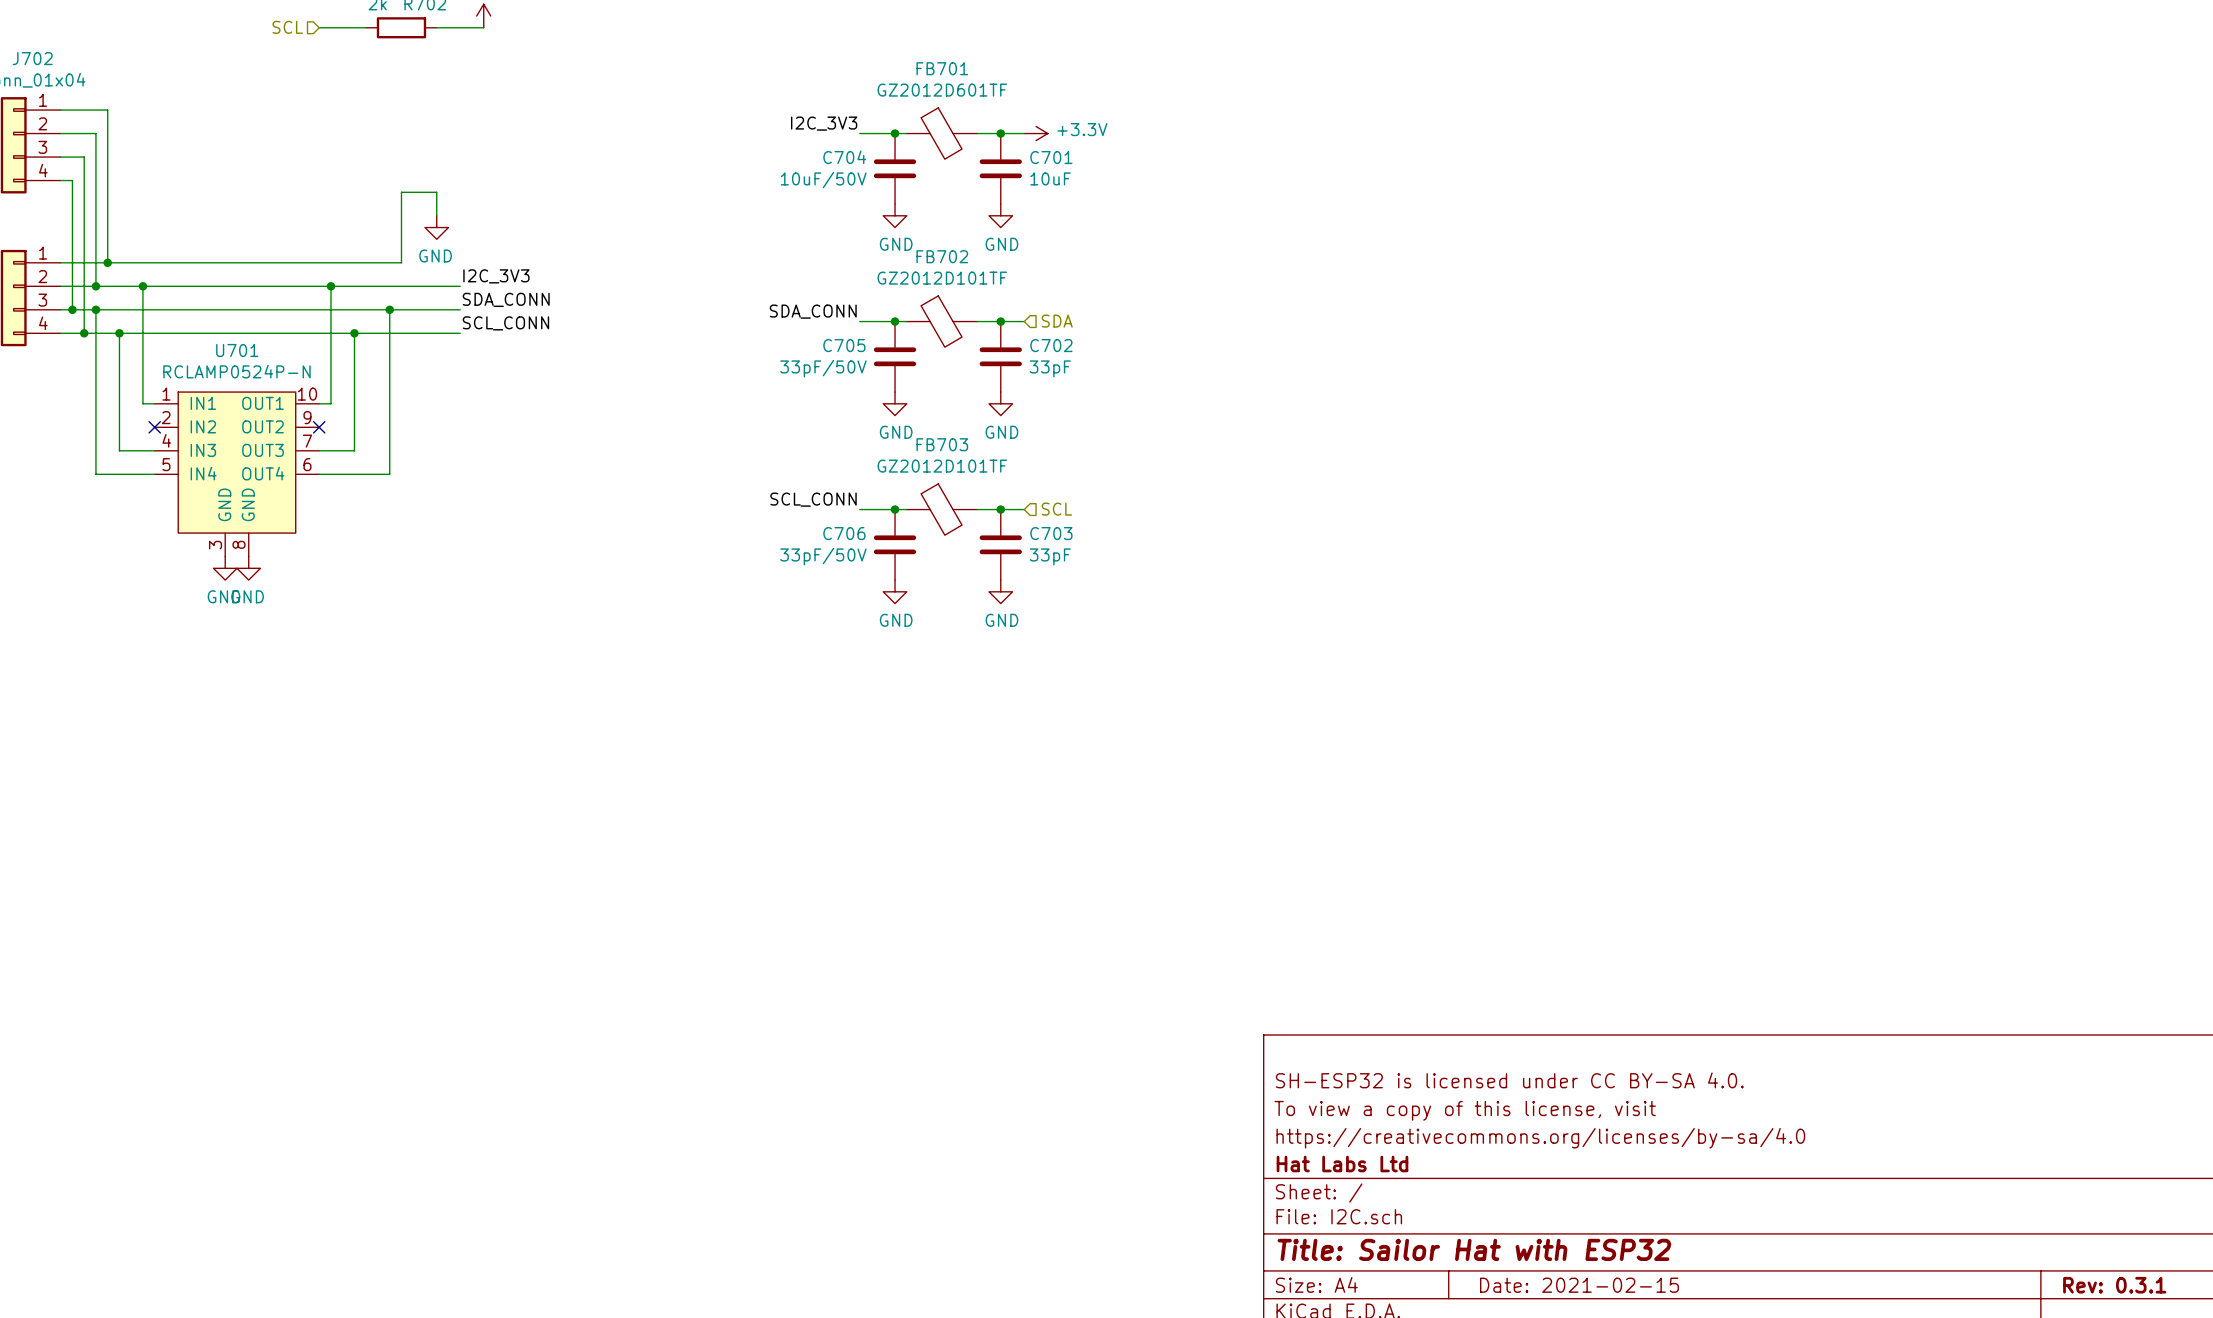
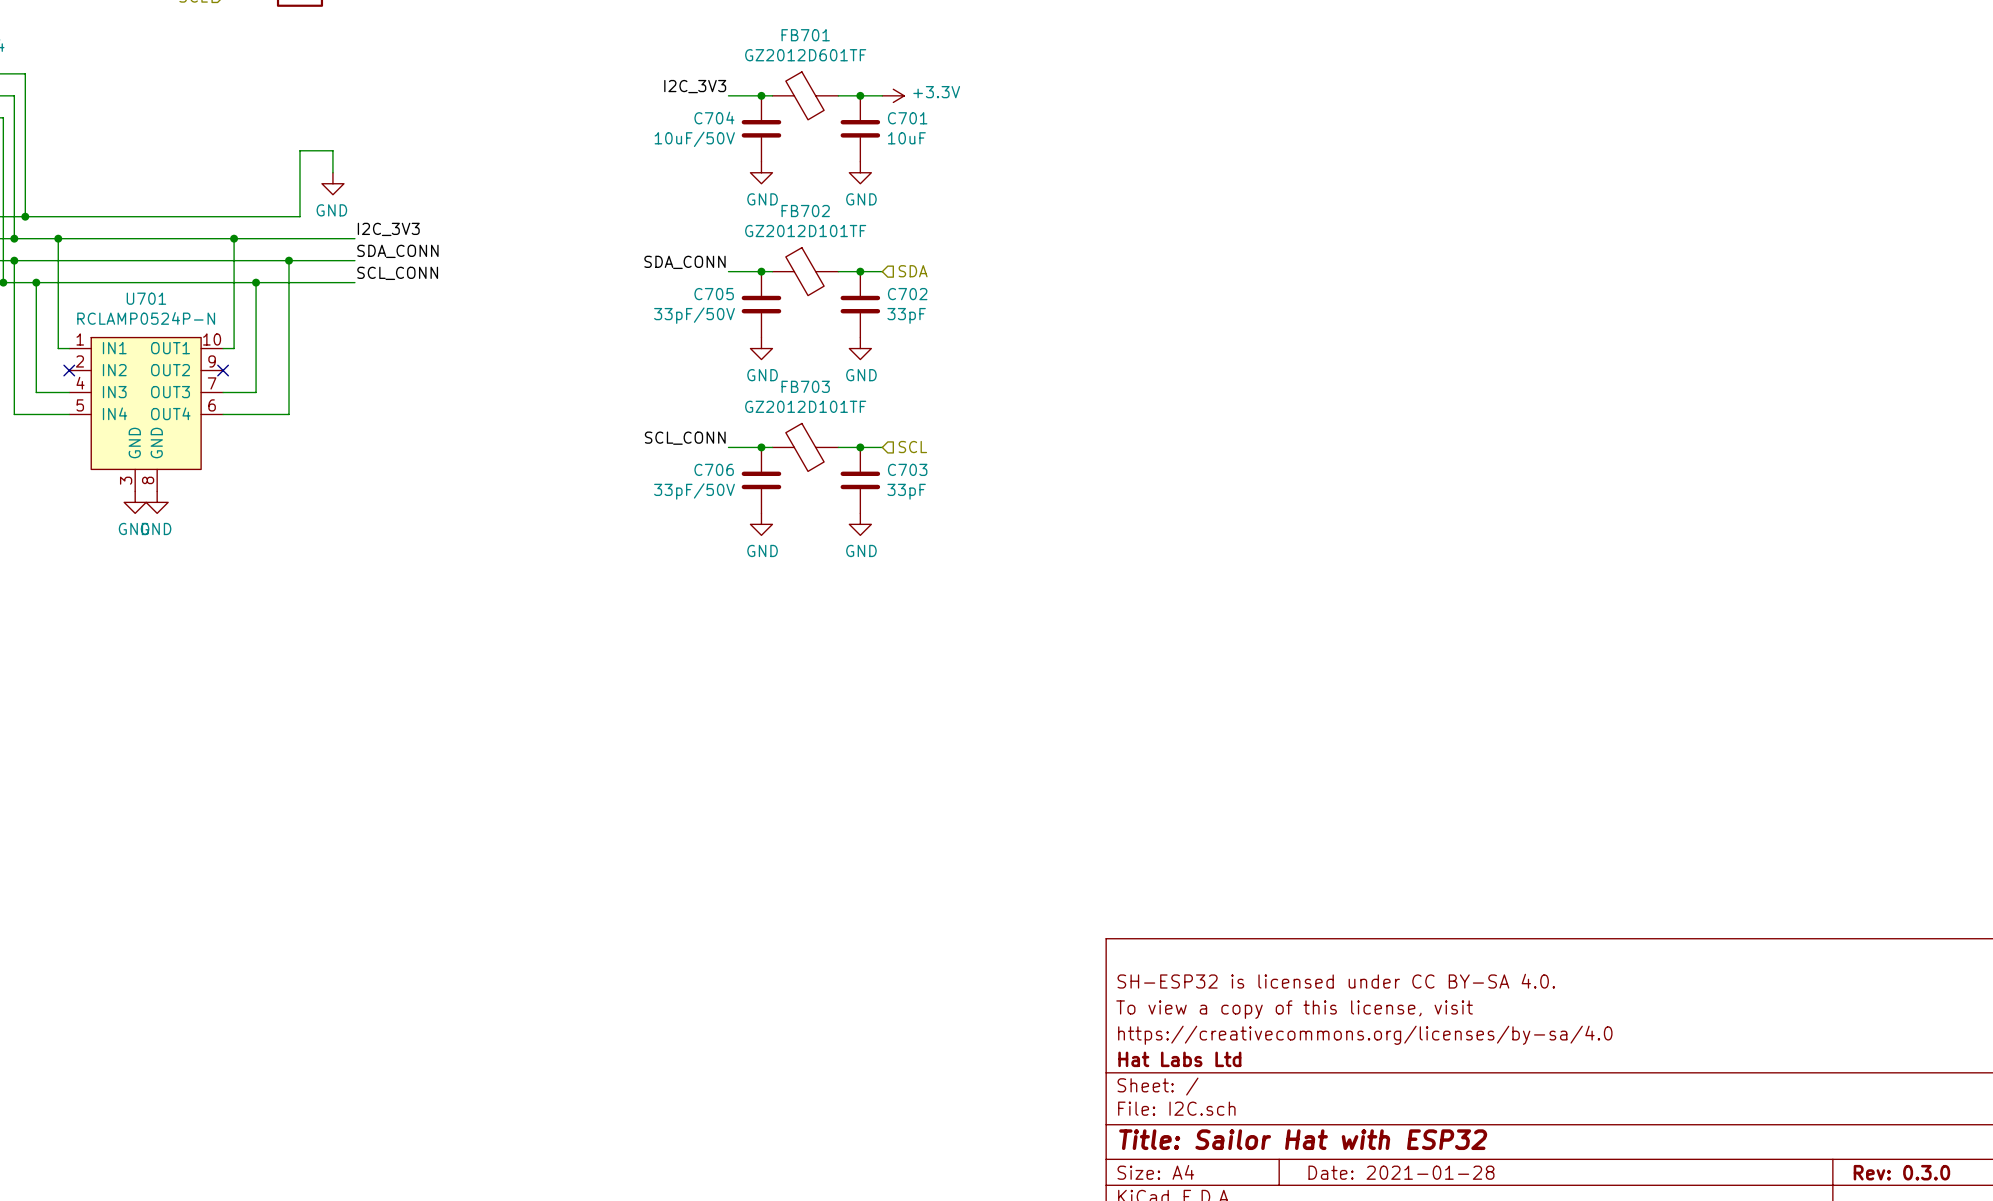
title block: Date: 2021-02-15 (1579, 1285) -> Date: 2021-01-28 (1401, 1172)
title block: Rev: 0.3.1 (2114, 1285) -> Rev: 0.3.0 (1901, 1172)

